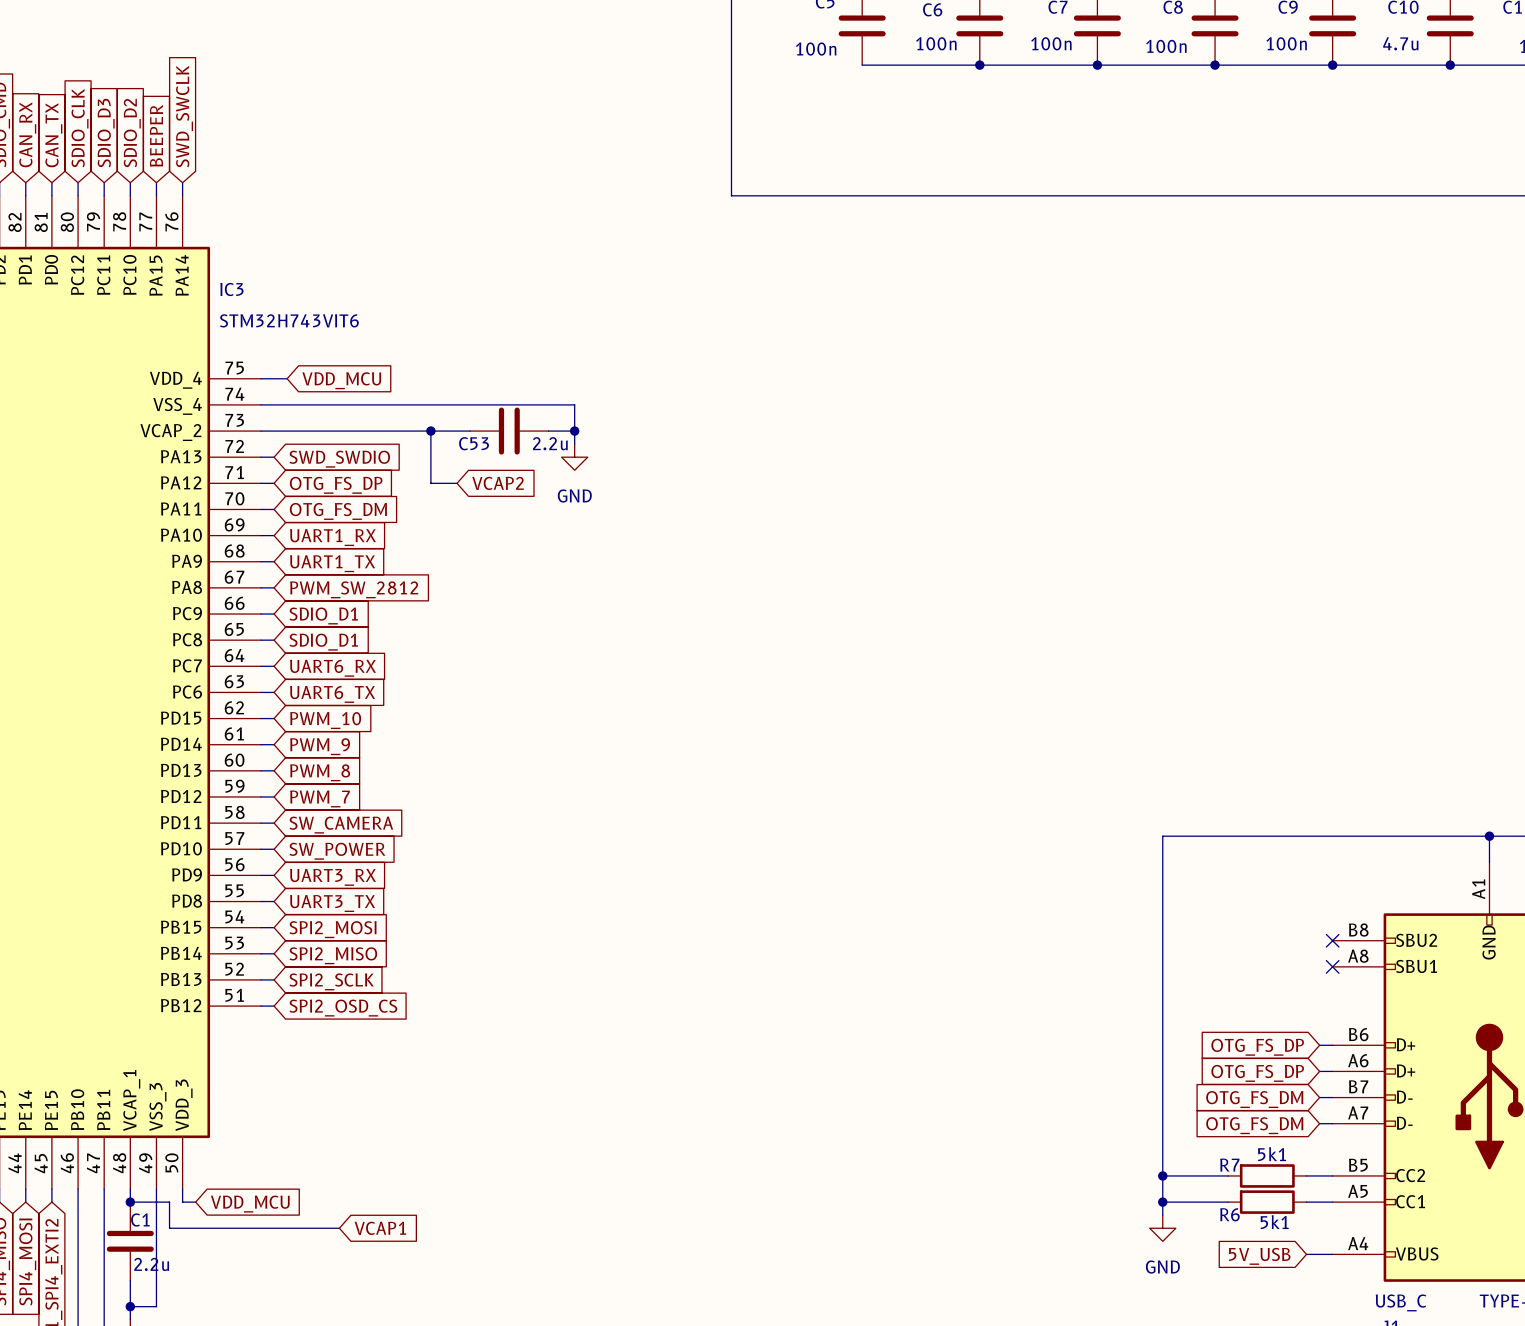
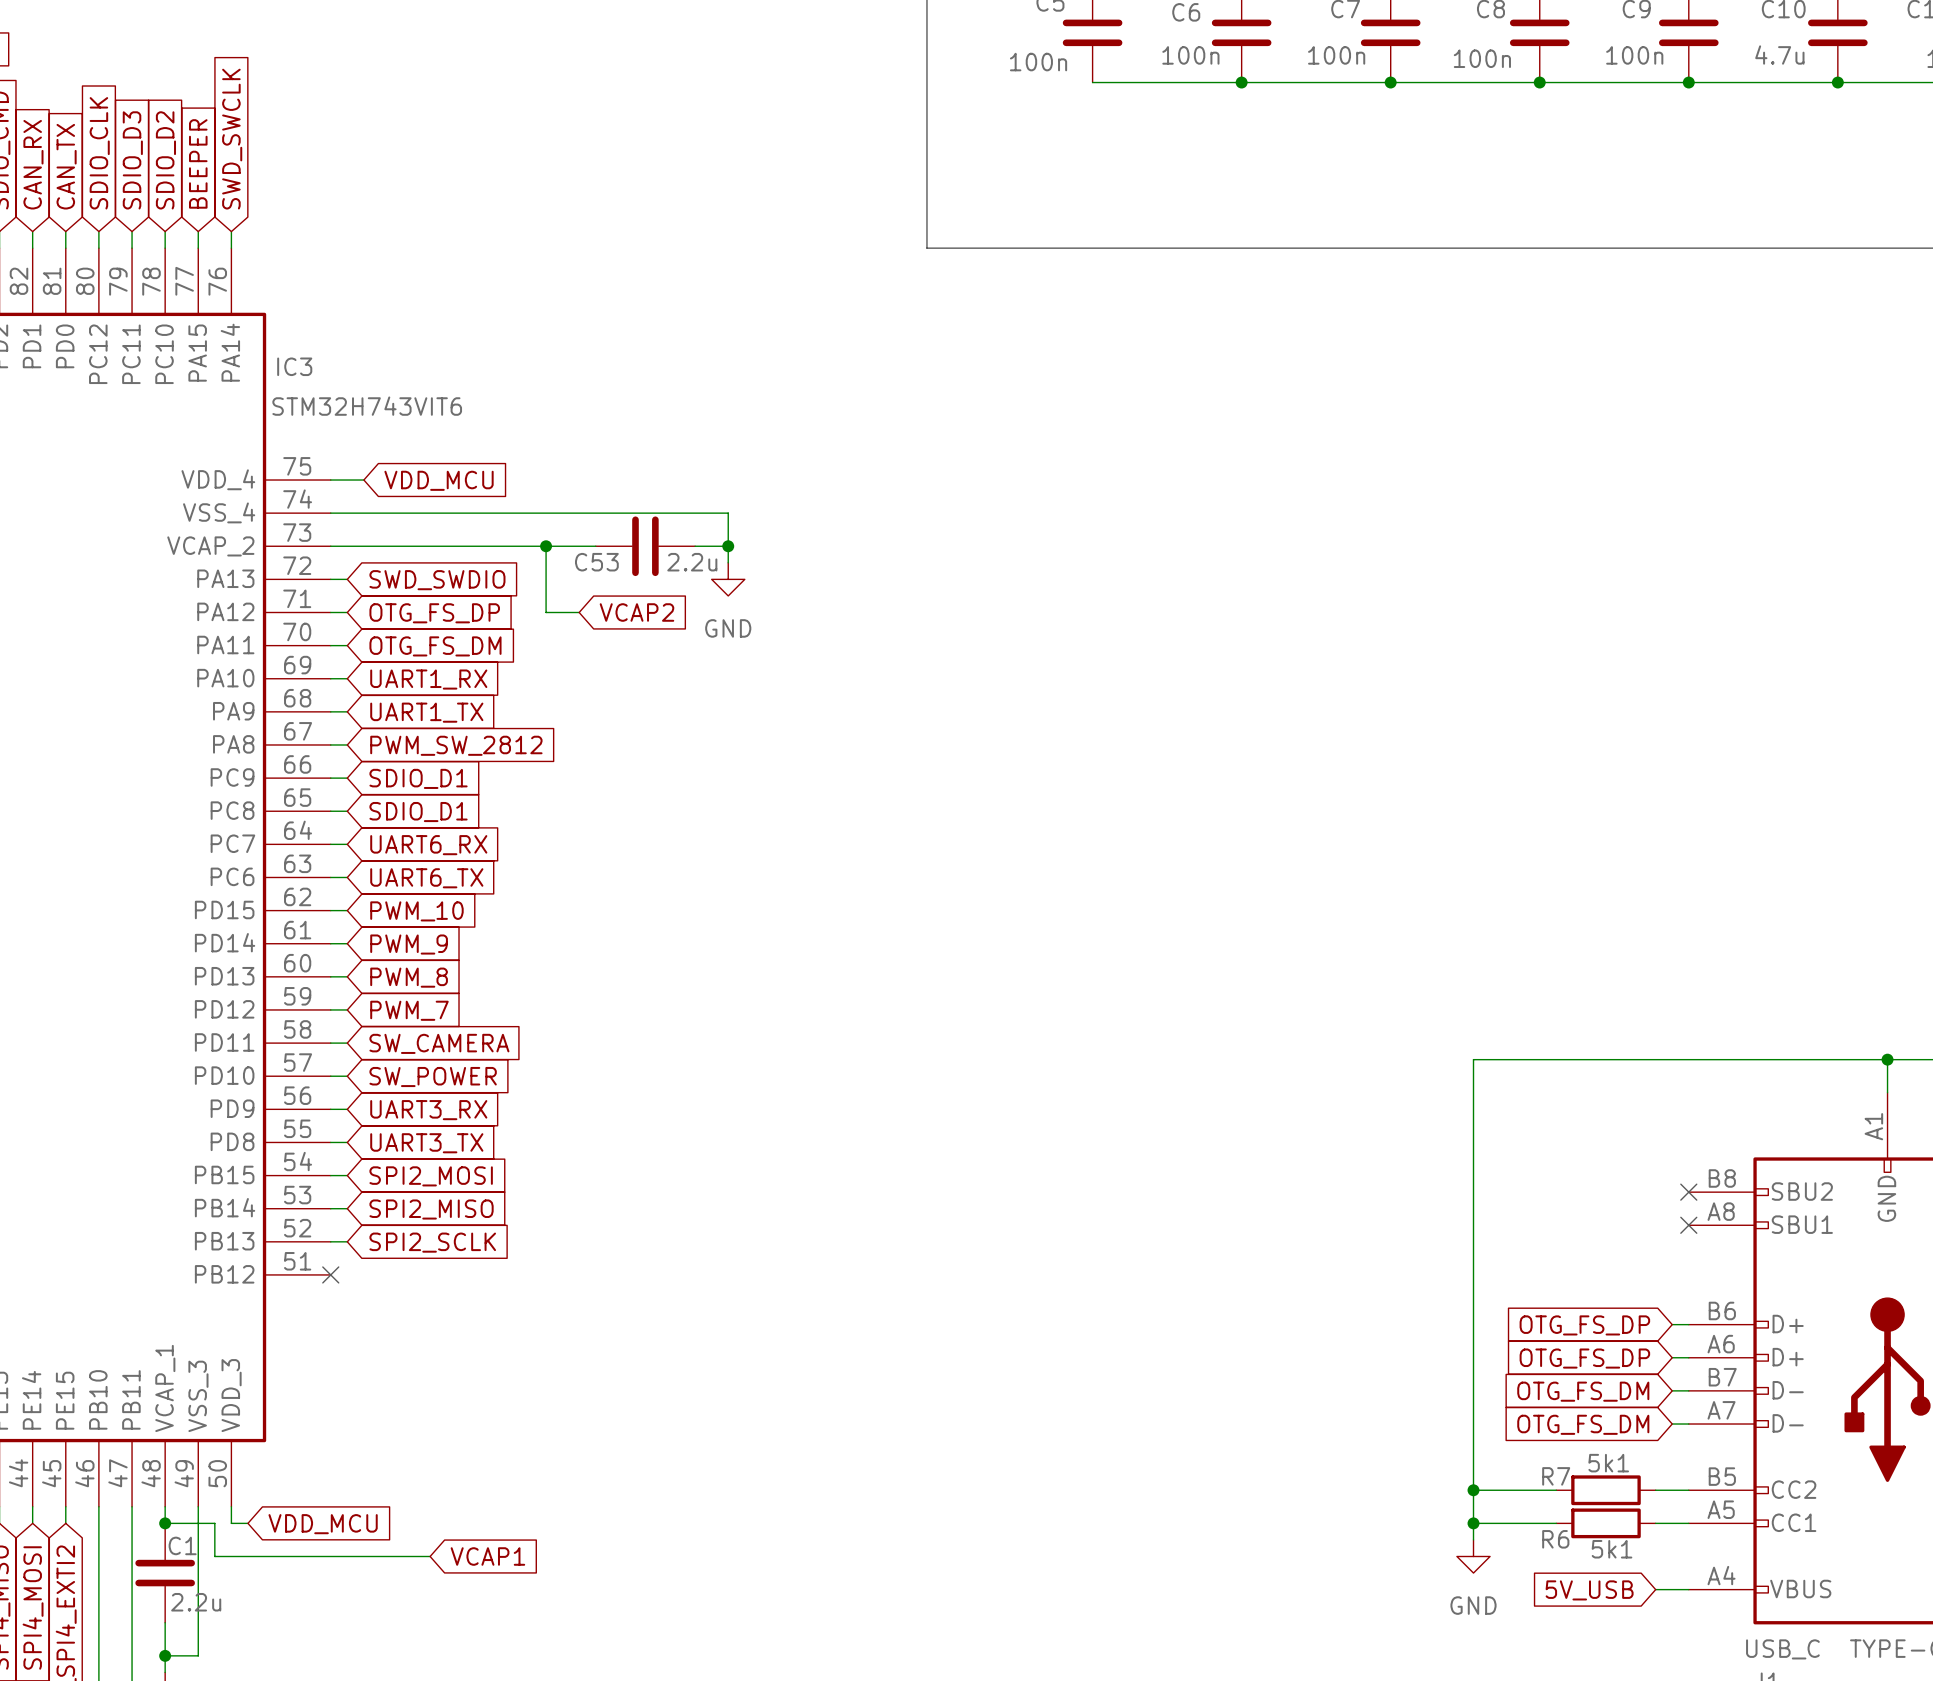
wire: (261, 1006) (274, 1006) -> none
no-connect mark: none -> (330, 1274)
global label: SPI2_OSD_CS (343, 1008) -> none

